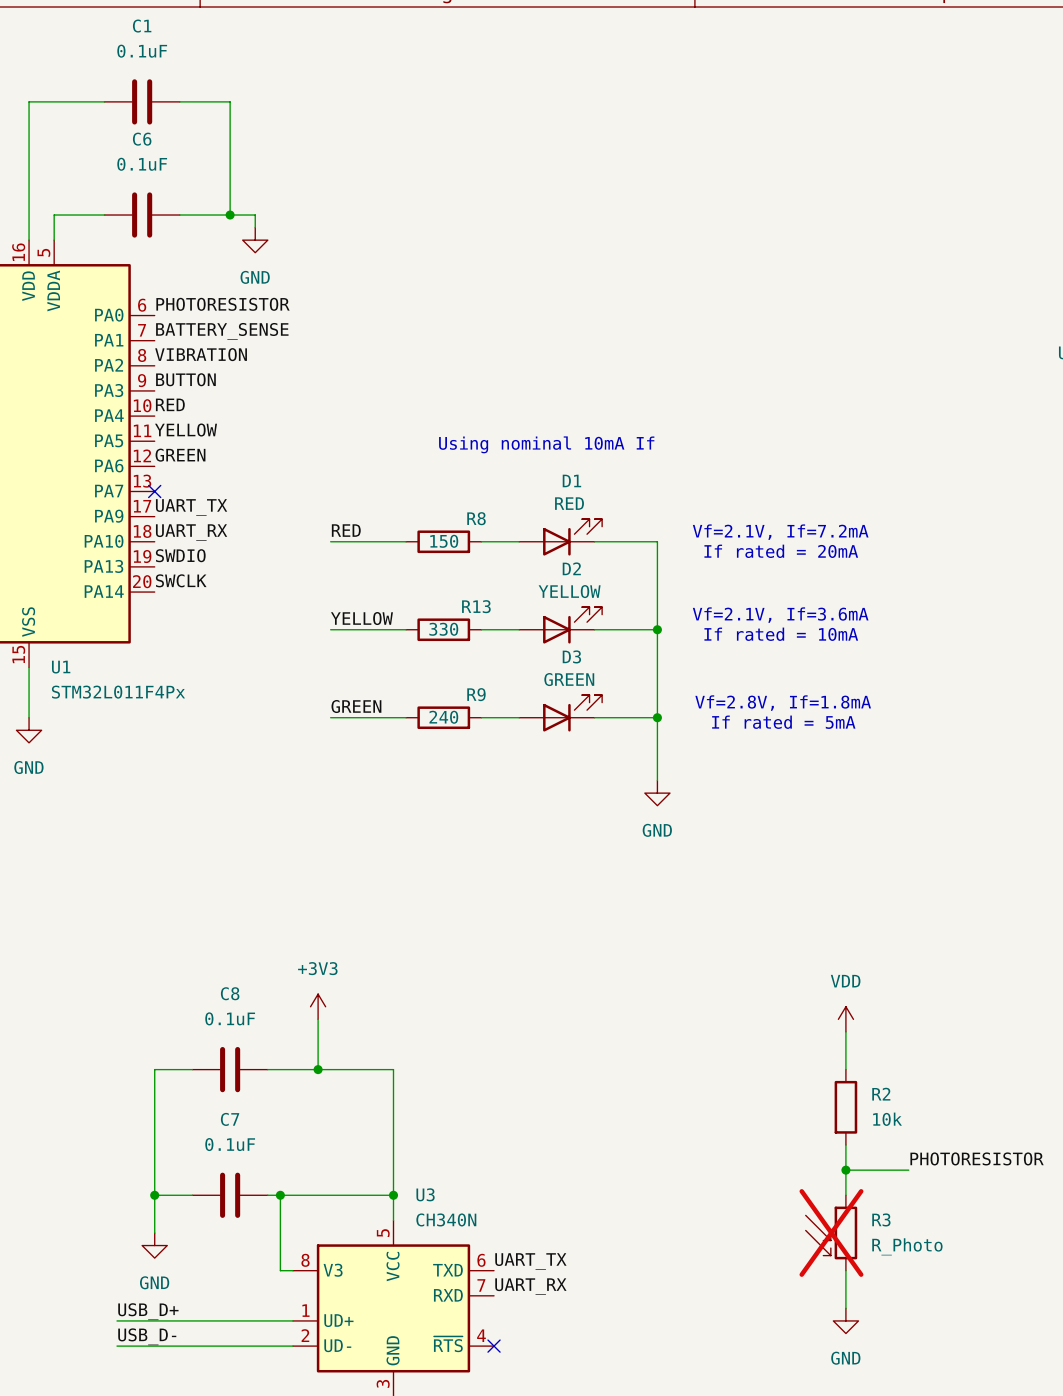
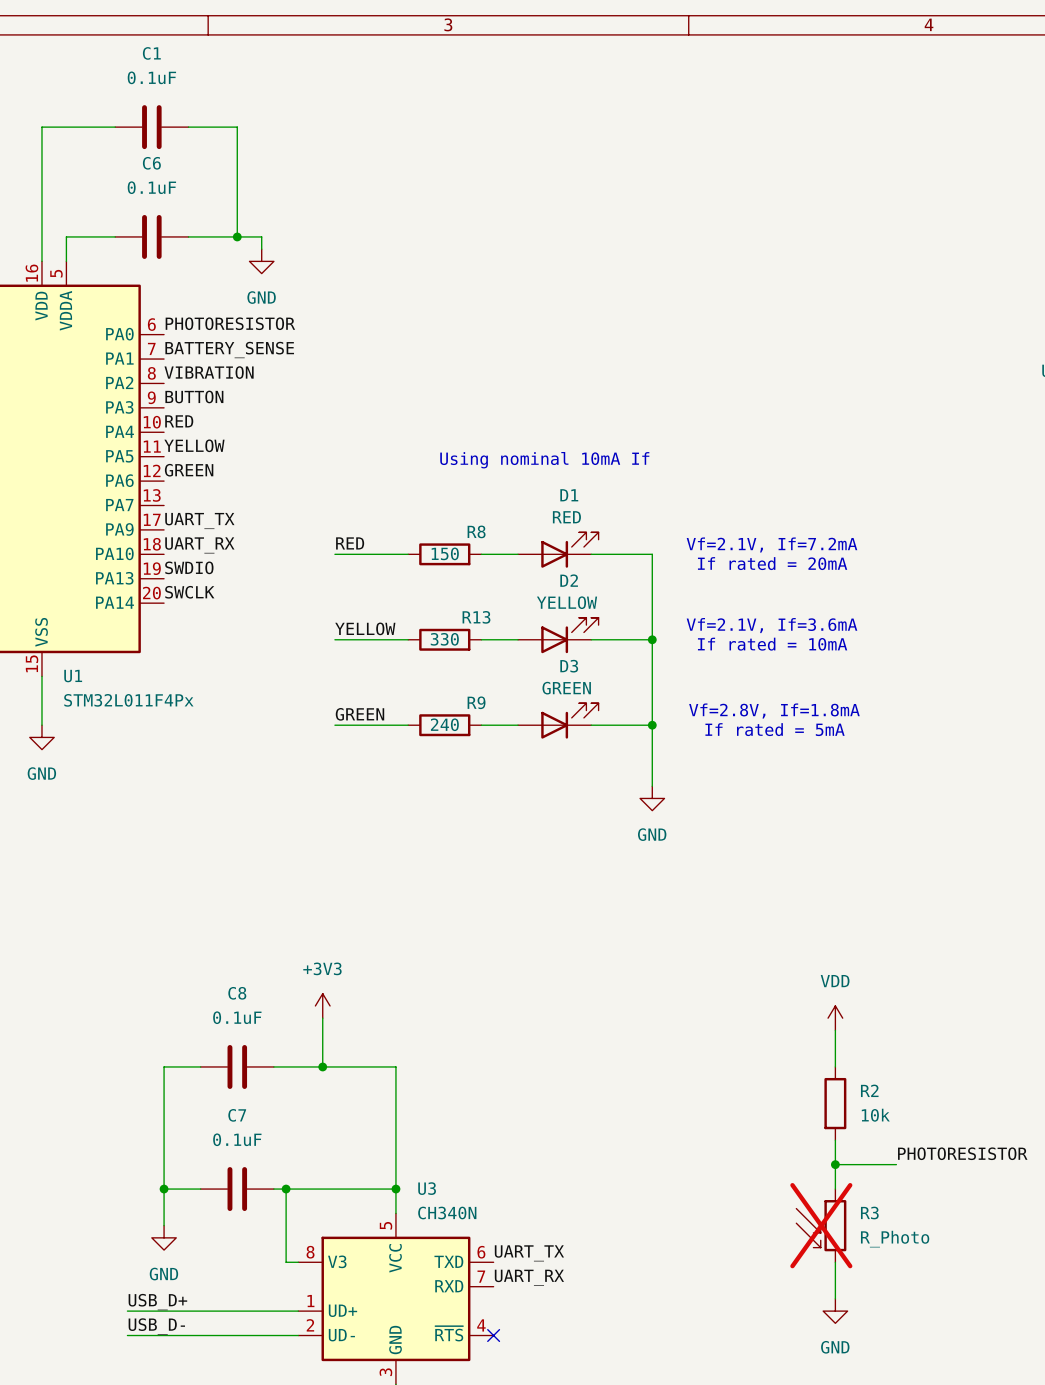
no-connect mark: (154, 491) -> none

